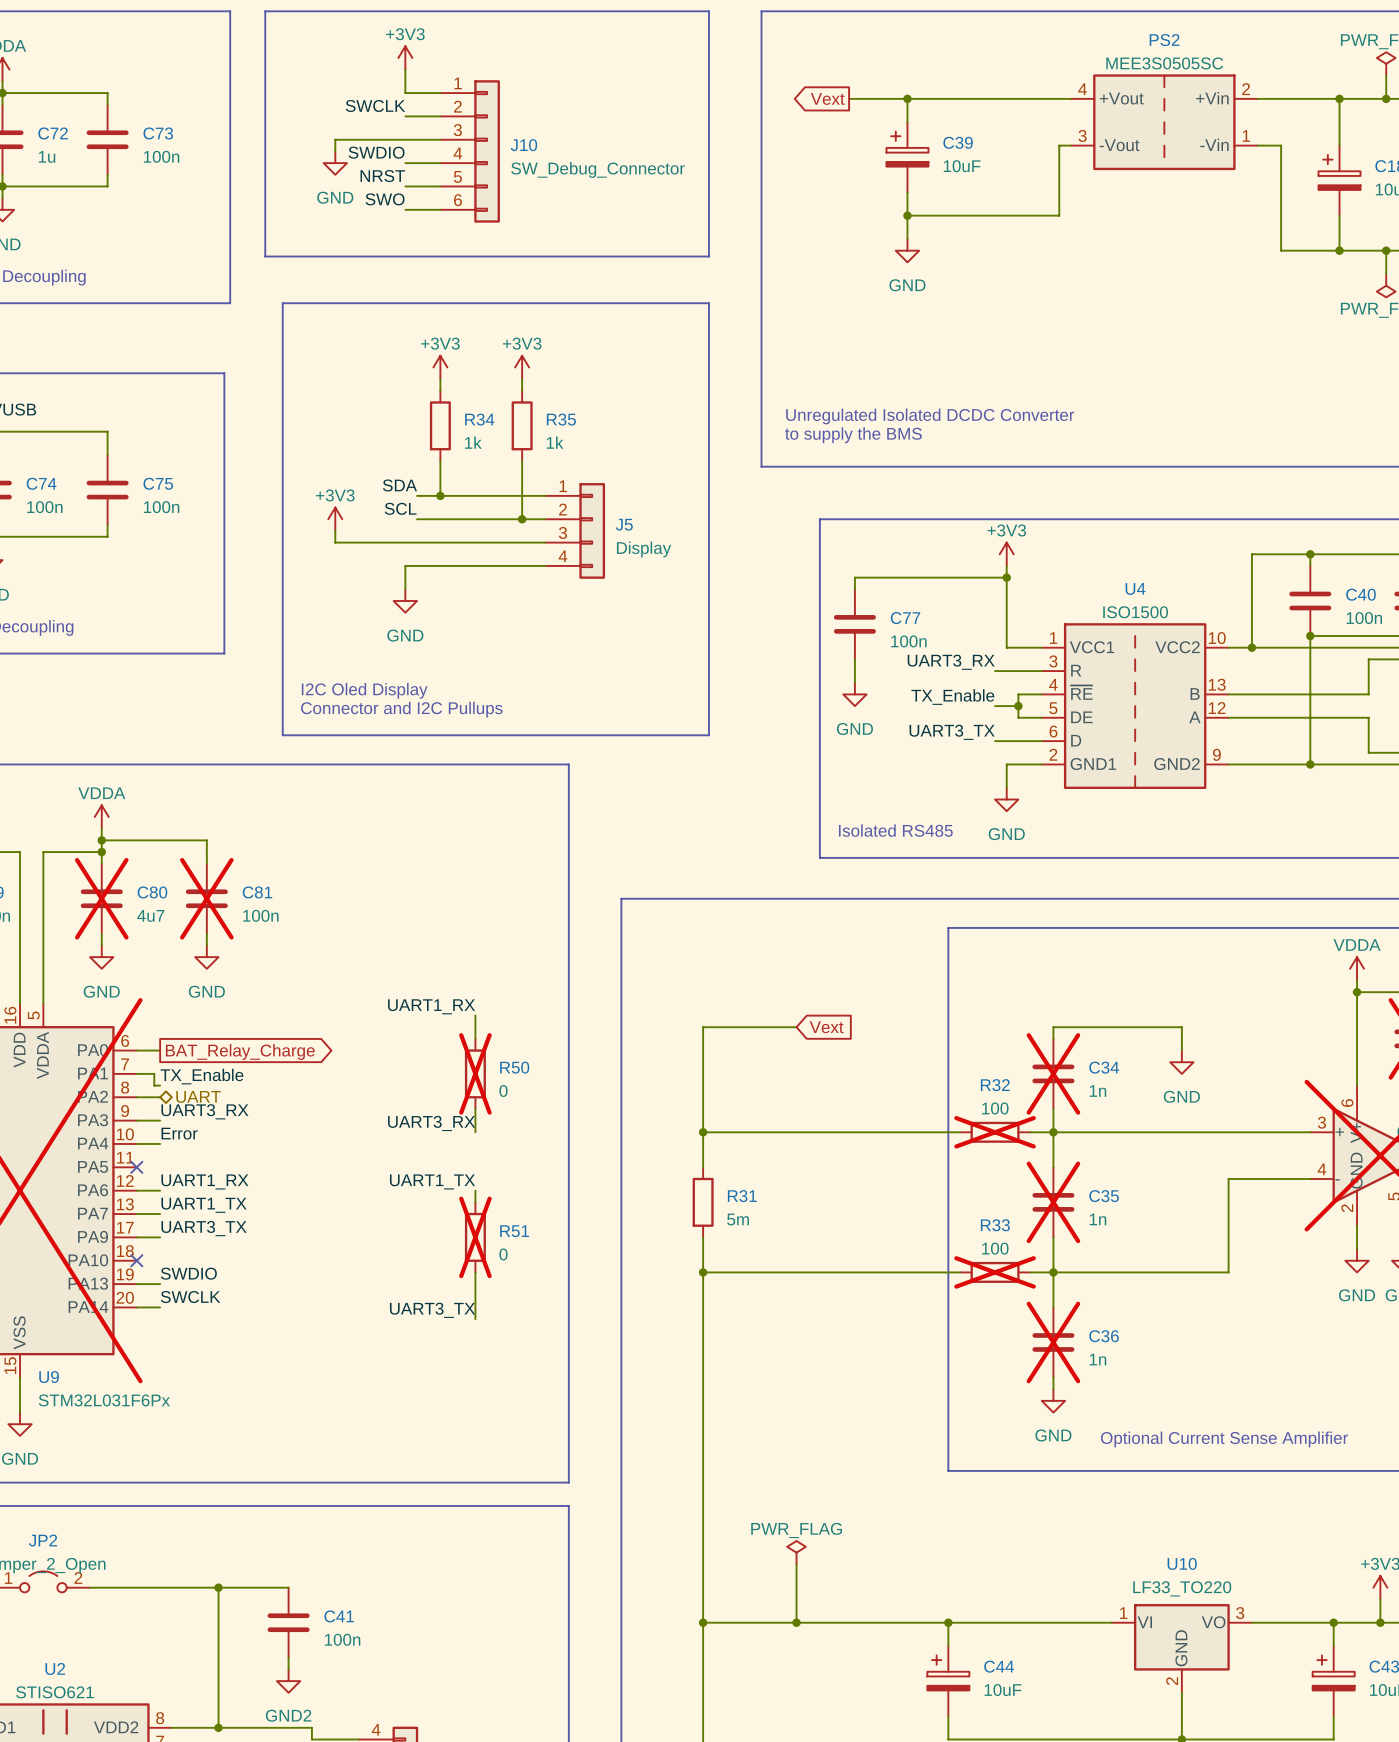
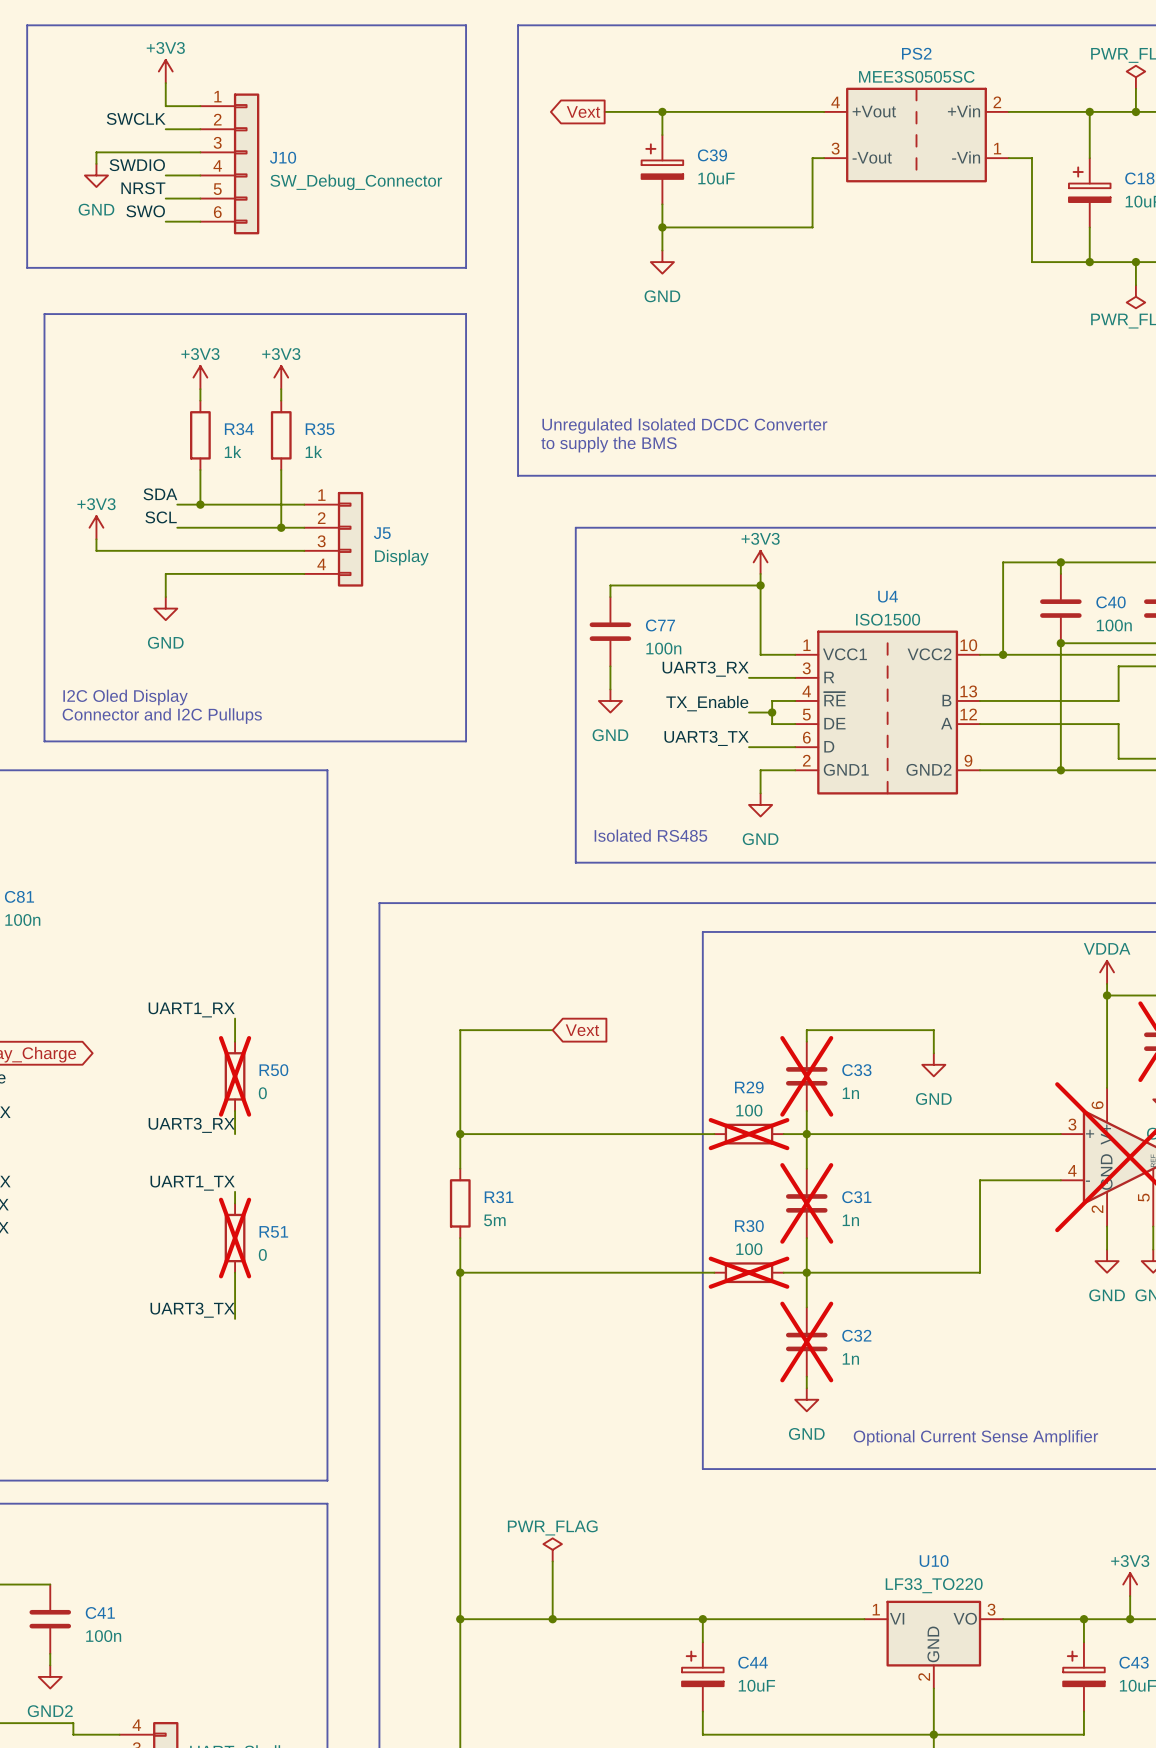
C34 name: C34 (1104, 1067) -> C33 (856, 1070)
R32 name: R32 (995, 1085) -> R29 (749, 1087)
C35 name: C35 (1104, 1196) -> C31 (856, 1197)
R33 name: R33 (995, 1225) -> R30 (749, 1226)
C36 name: C36 (1104, 1336) -> C32 (856, 1335)

